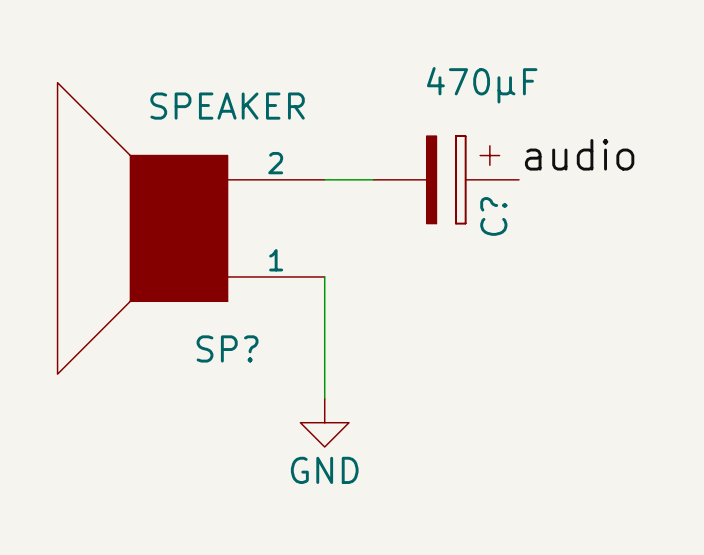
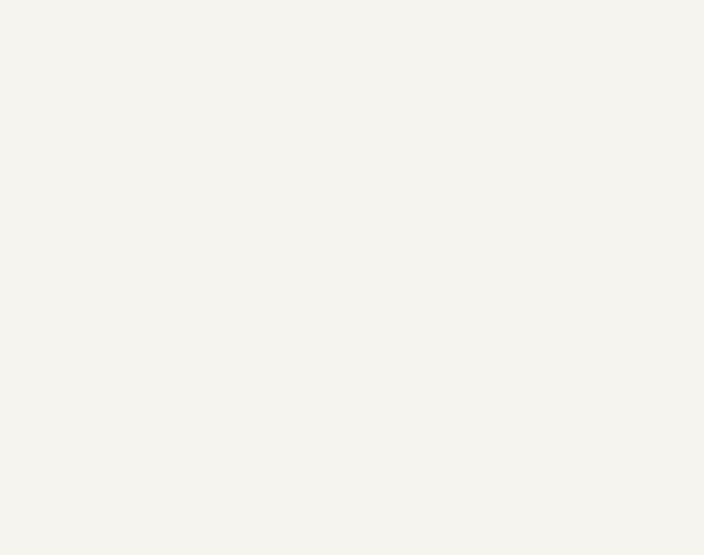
label: audio (579, 154) -> none
wire: (324, 179) (373, 179) -> none
C?: 470µF (446, 179) -> none
SP?: SPEAKER (191, 228) -> none
wire: (324, 276) (324, 398) -> none
power symbol: GND (324, 422) -> none

